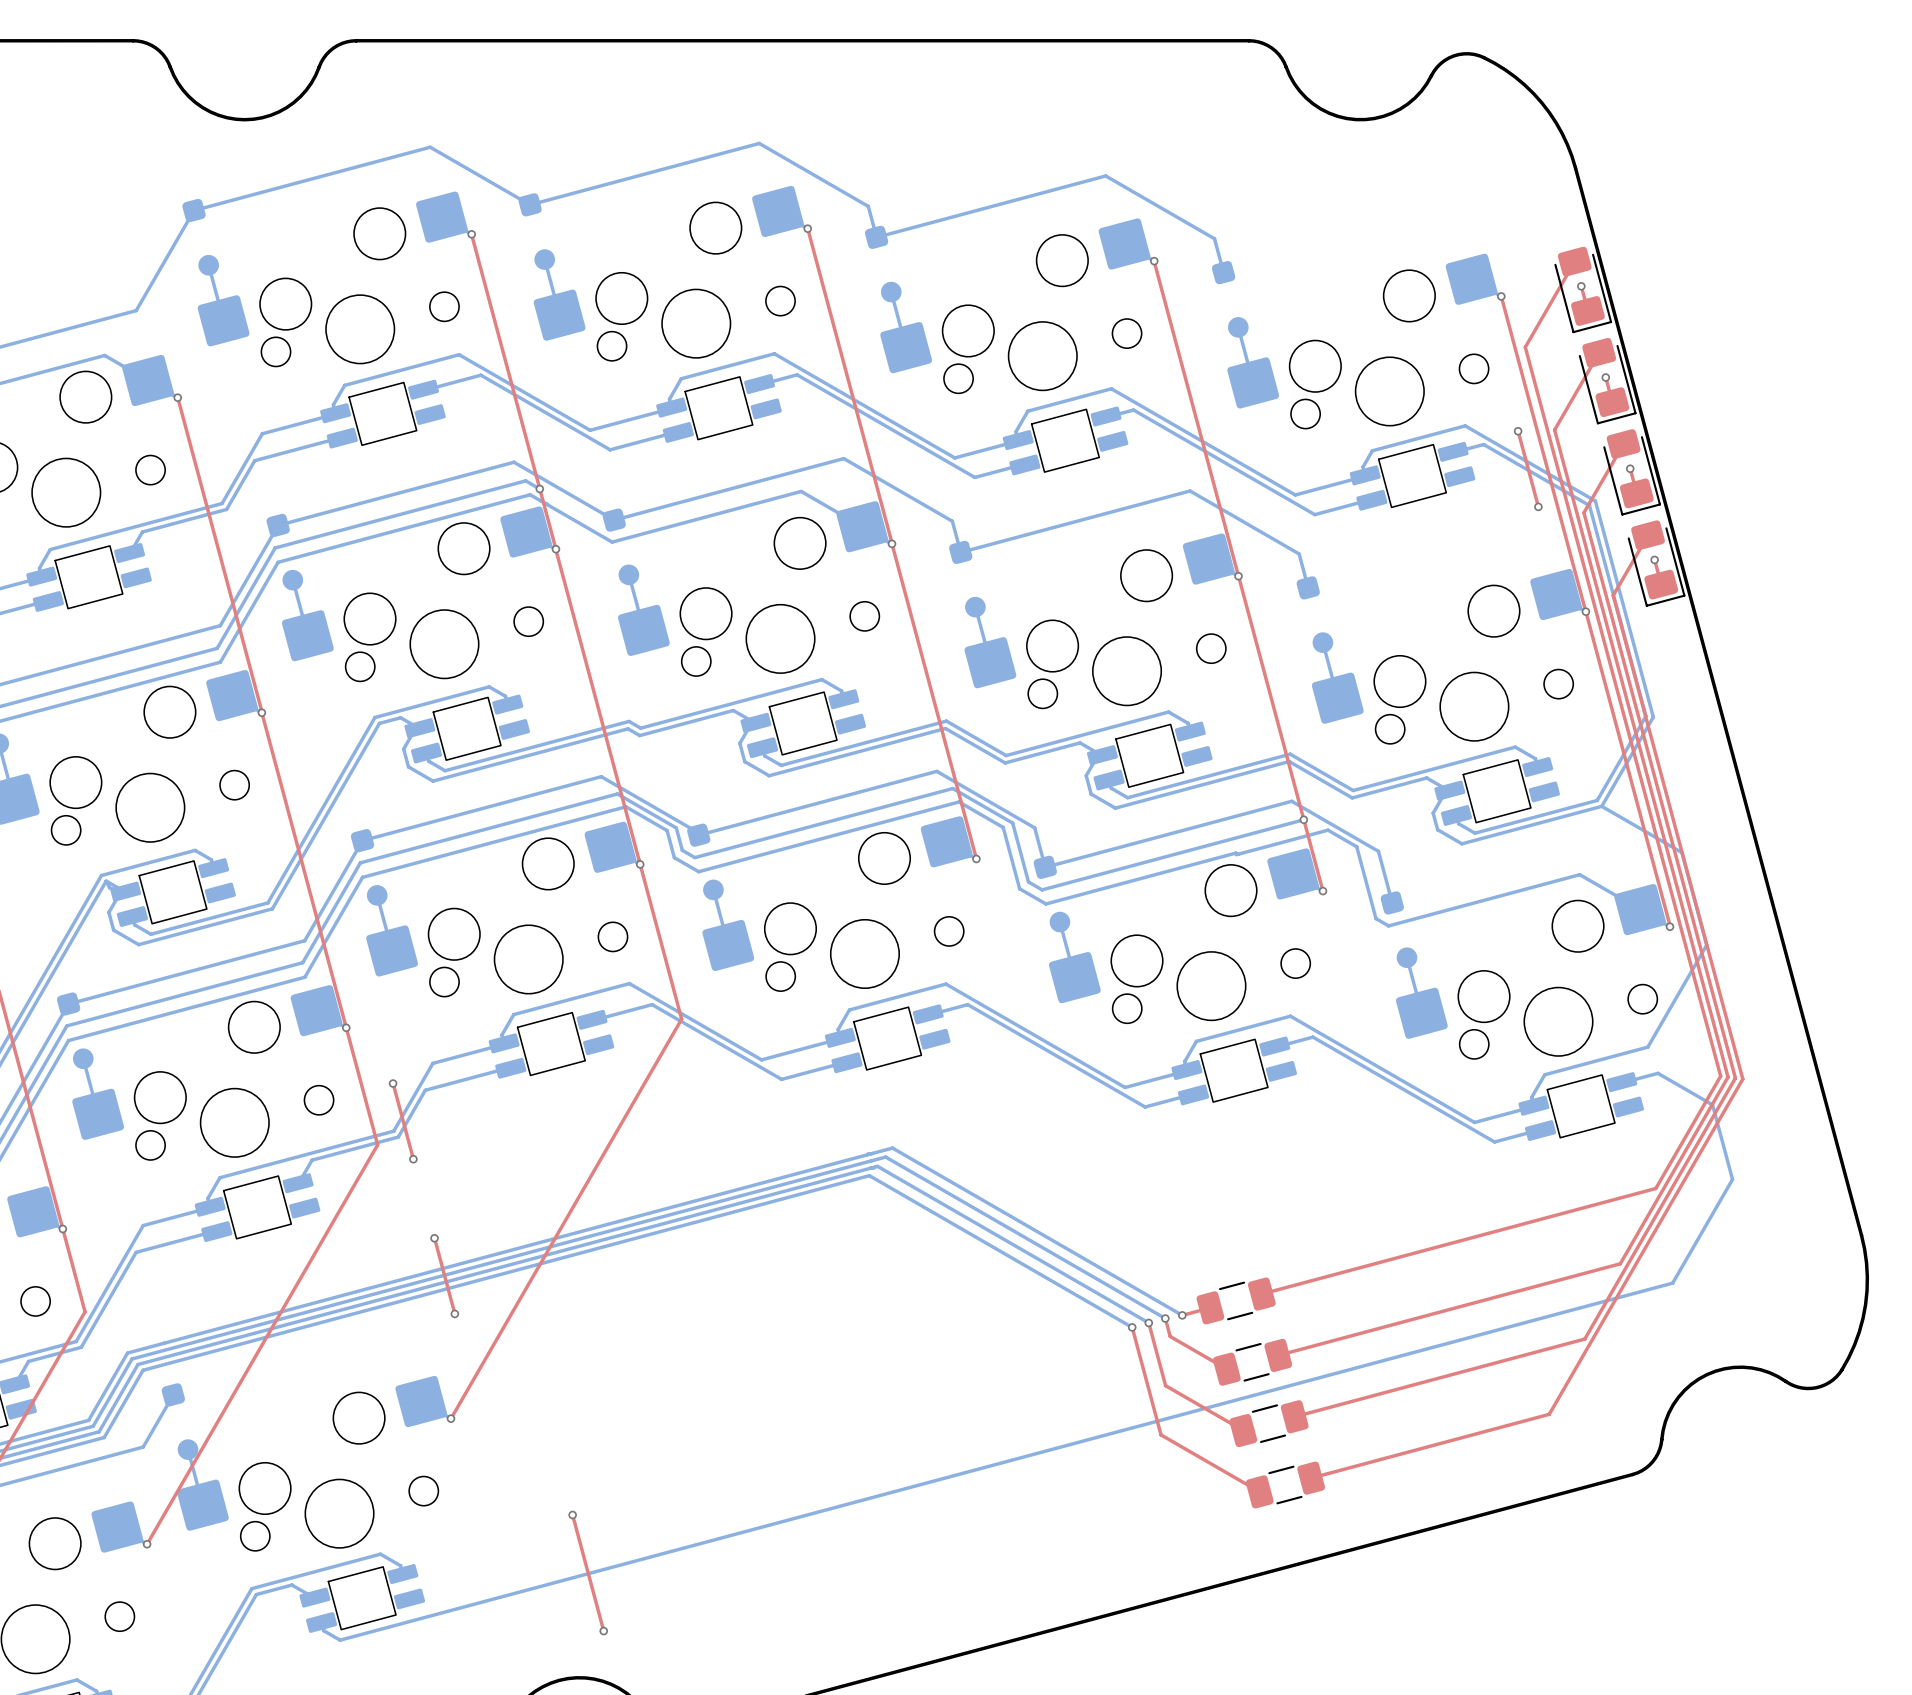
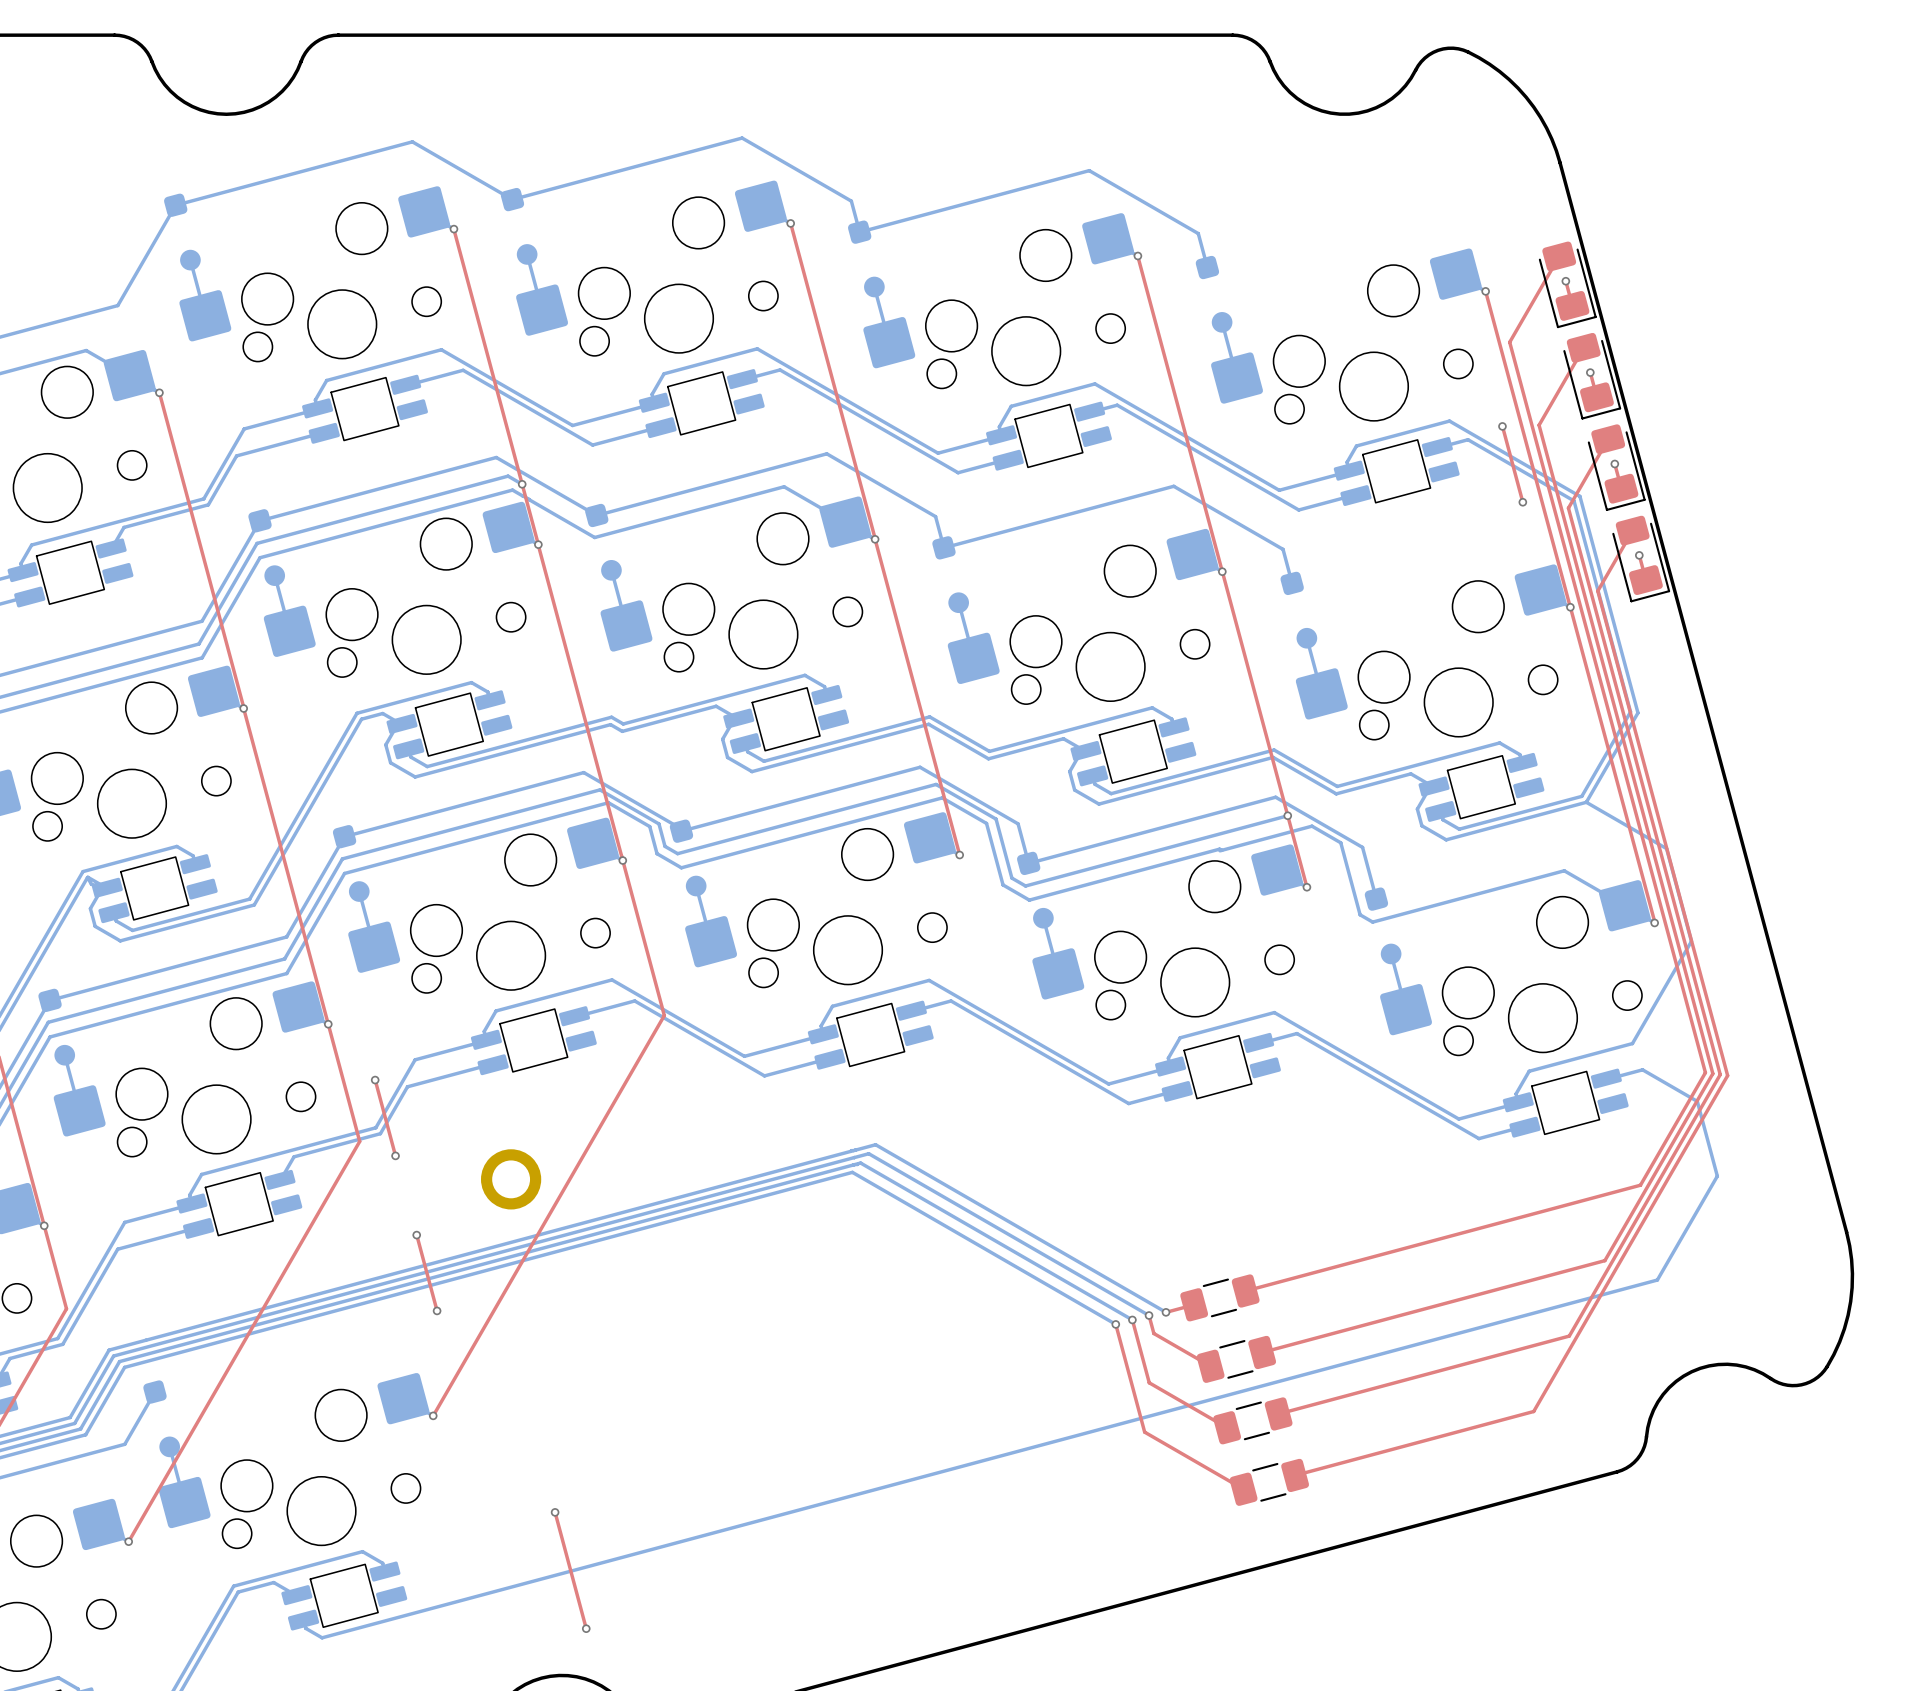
part: none -> (511, 1179)

